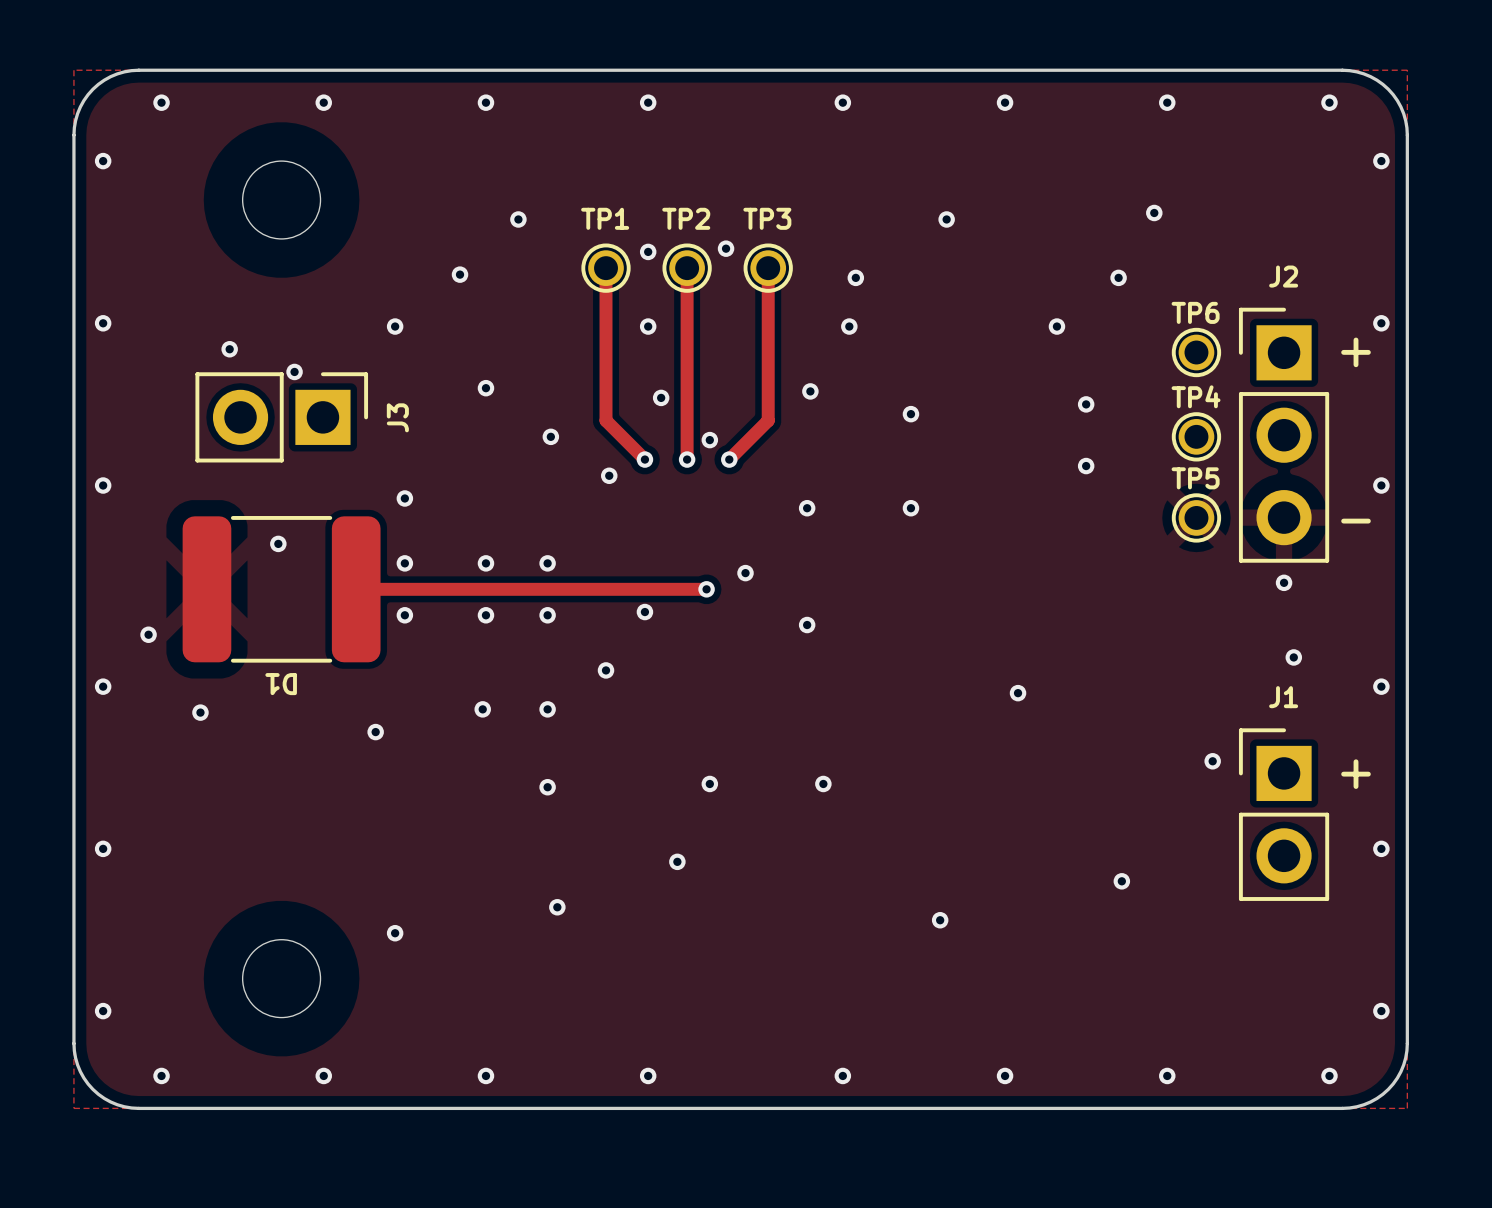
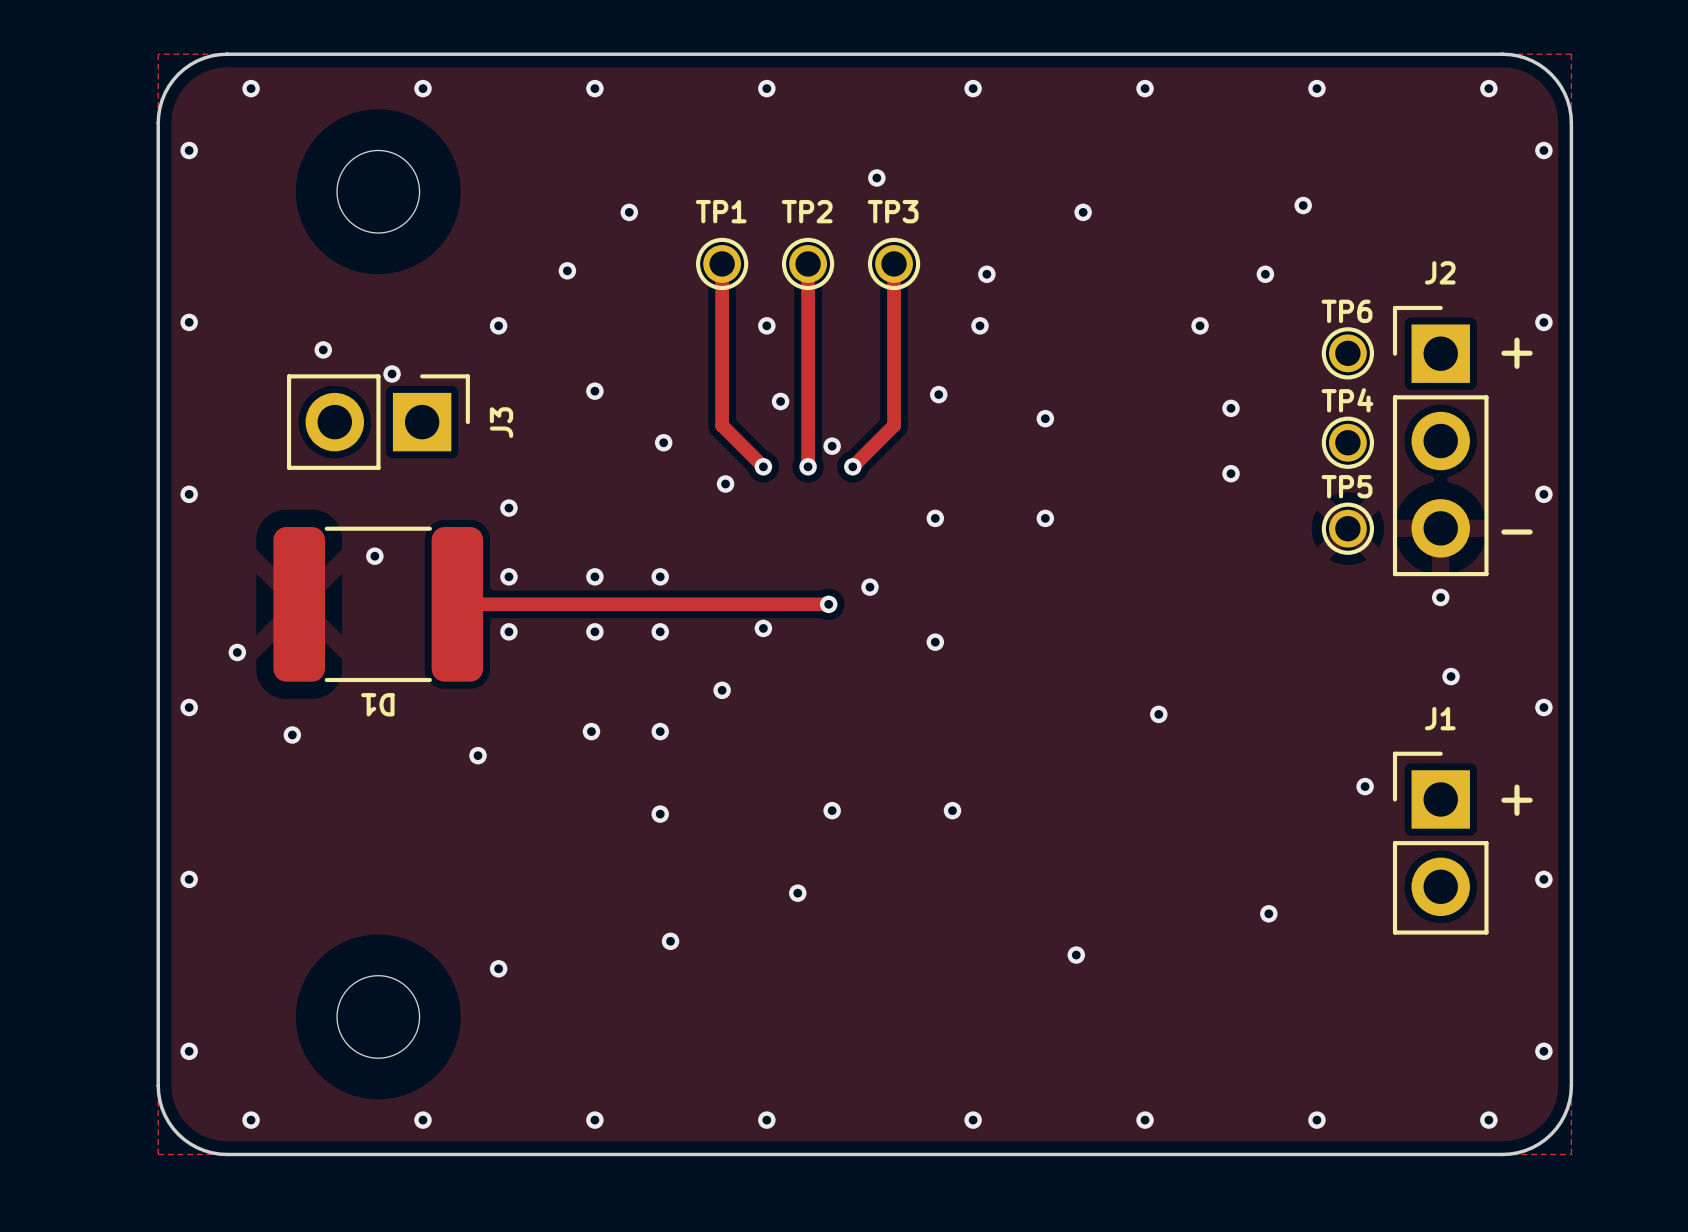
via: none -> (876, 177)
via: (726, 248) -> none
via: (648, 251) -> none

